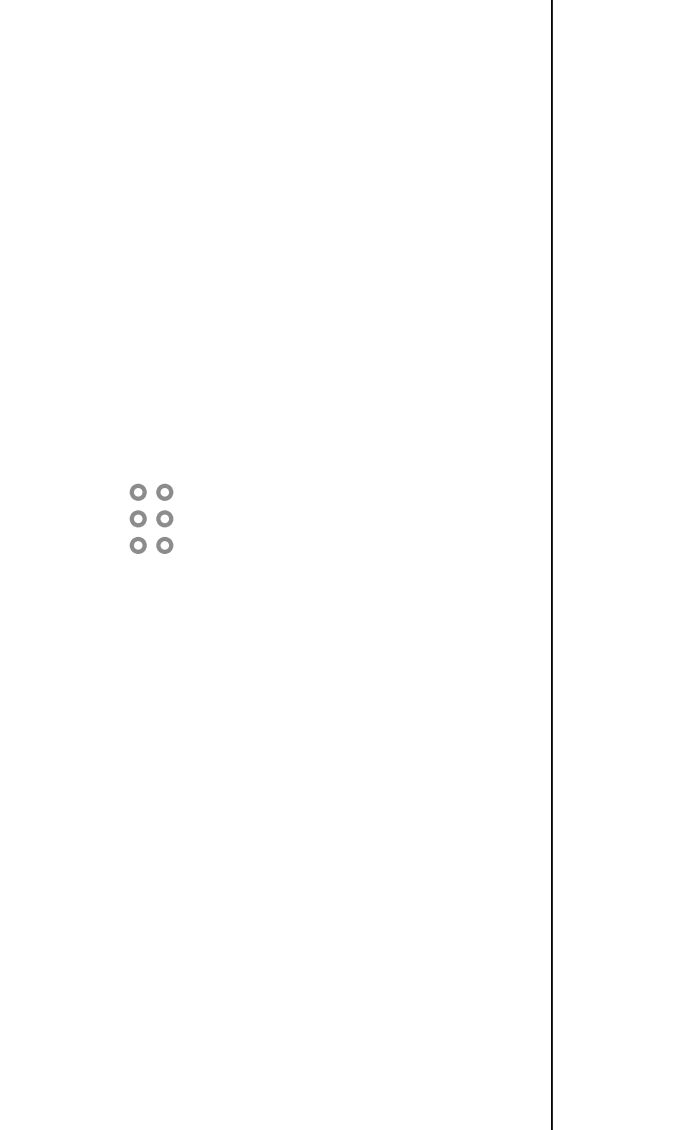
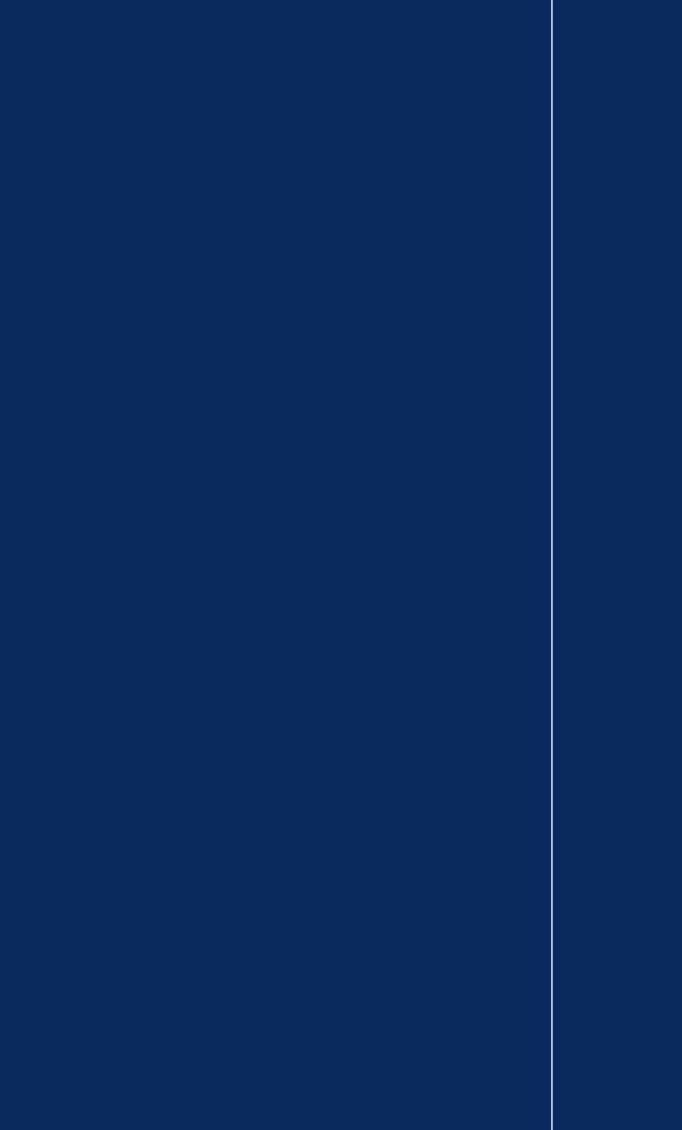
part: (151, 518) -> none

